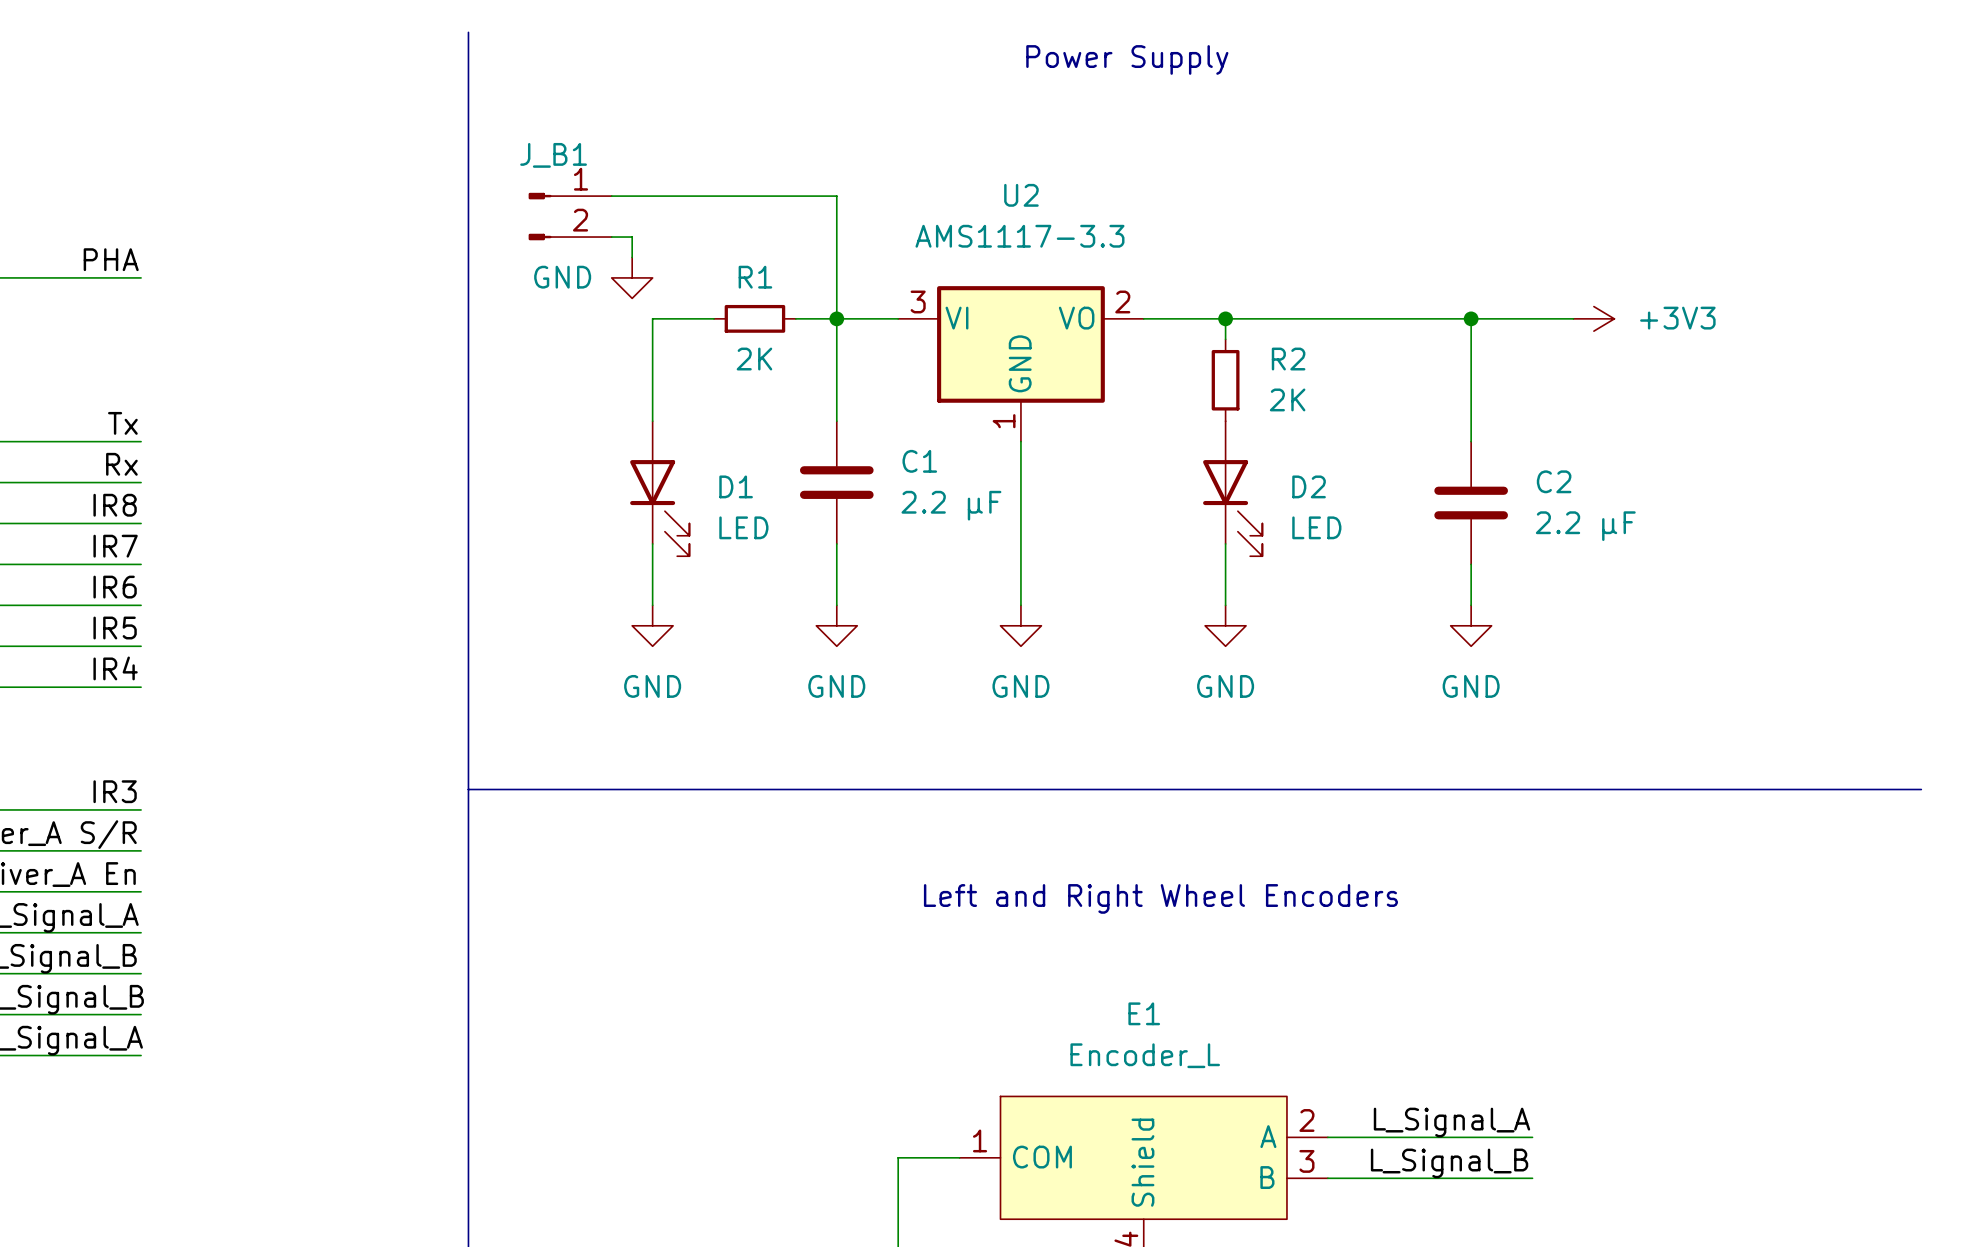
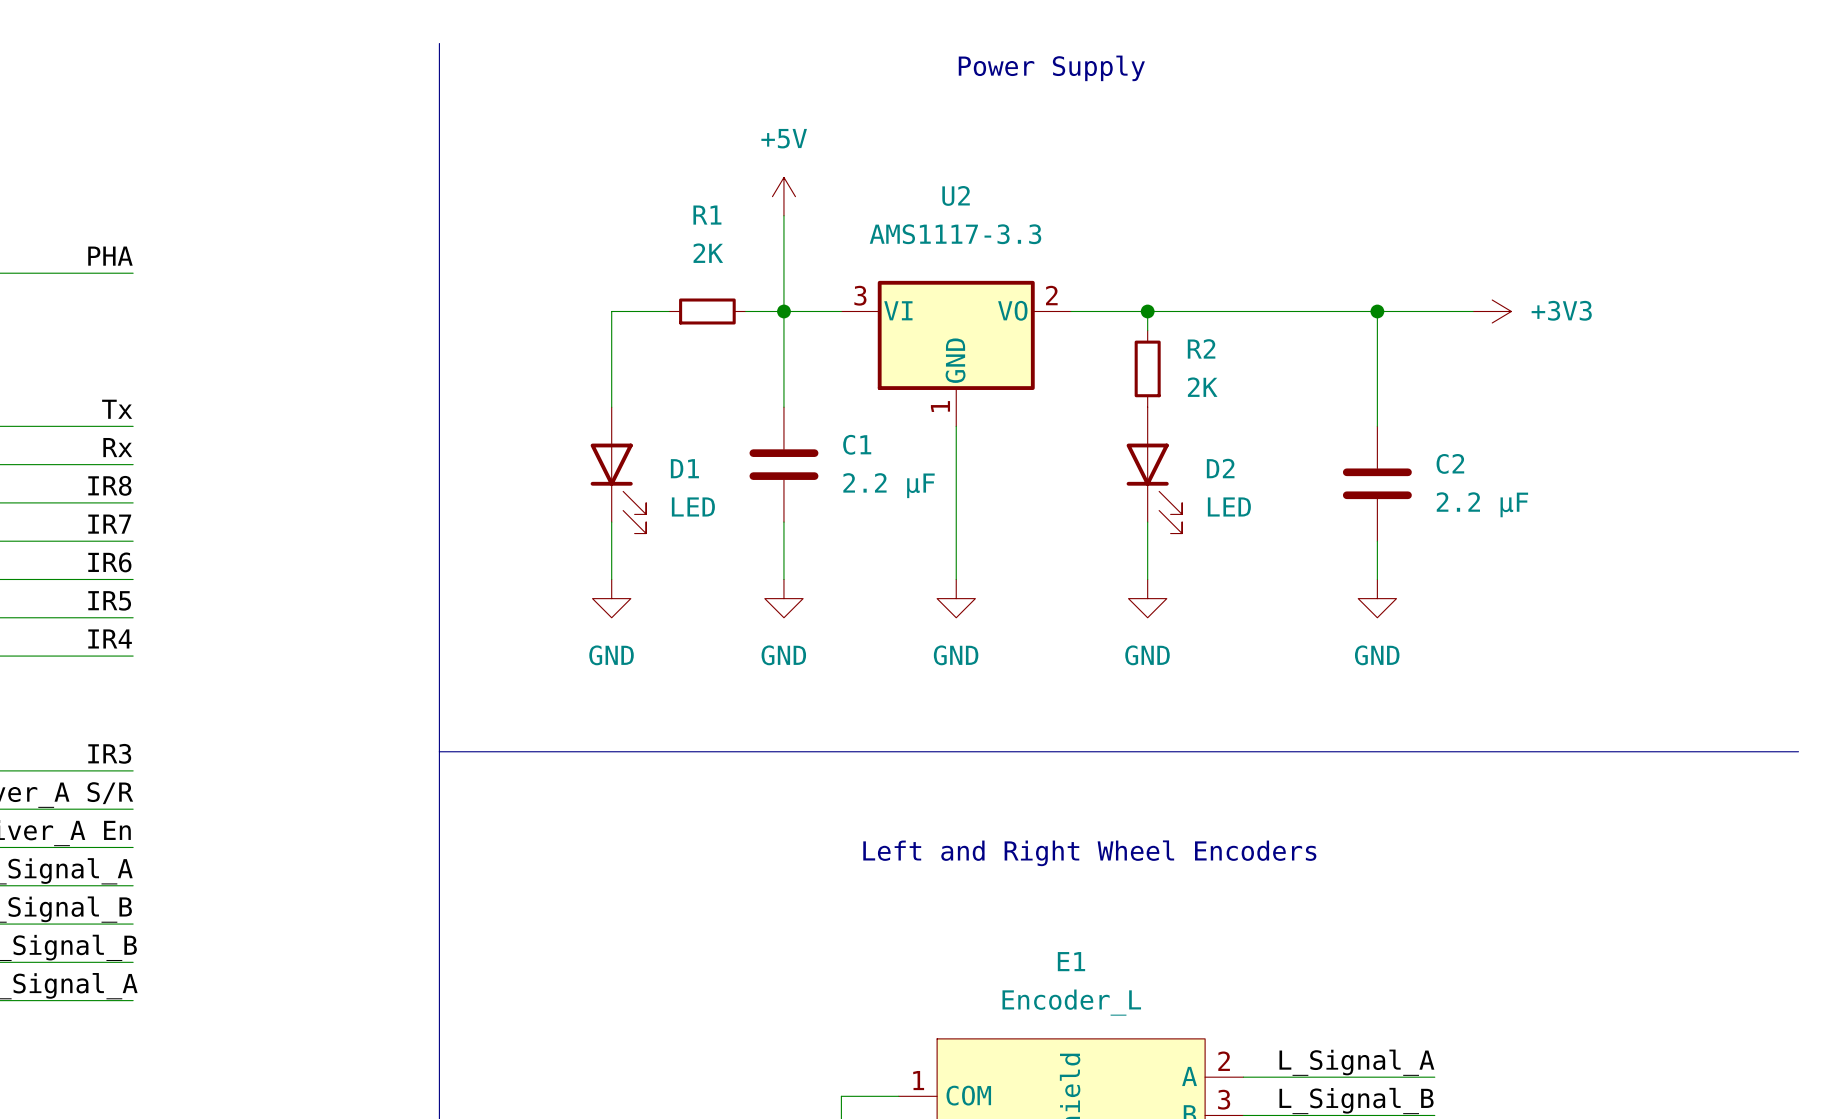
wire: (611, 196) (836, 196) (836, 216) -> none
power symbol: none -> +5V (783, 196)
J_B1: (570, 216) -> none
wire: (611, 237) (632, 237) (632, 257) -> none
power symbol: GND (632, 277) -> none
R1 name position: R1 (755, 277) -> R1 (707, 215)
R1 value position: 2K (754, 359) -> 2K (708, 253)

